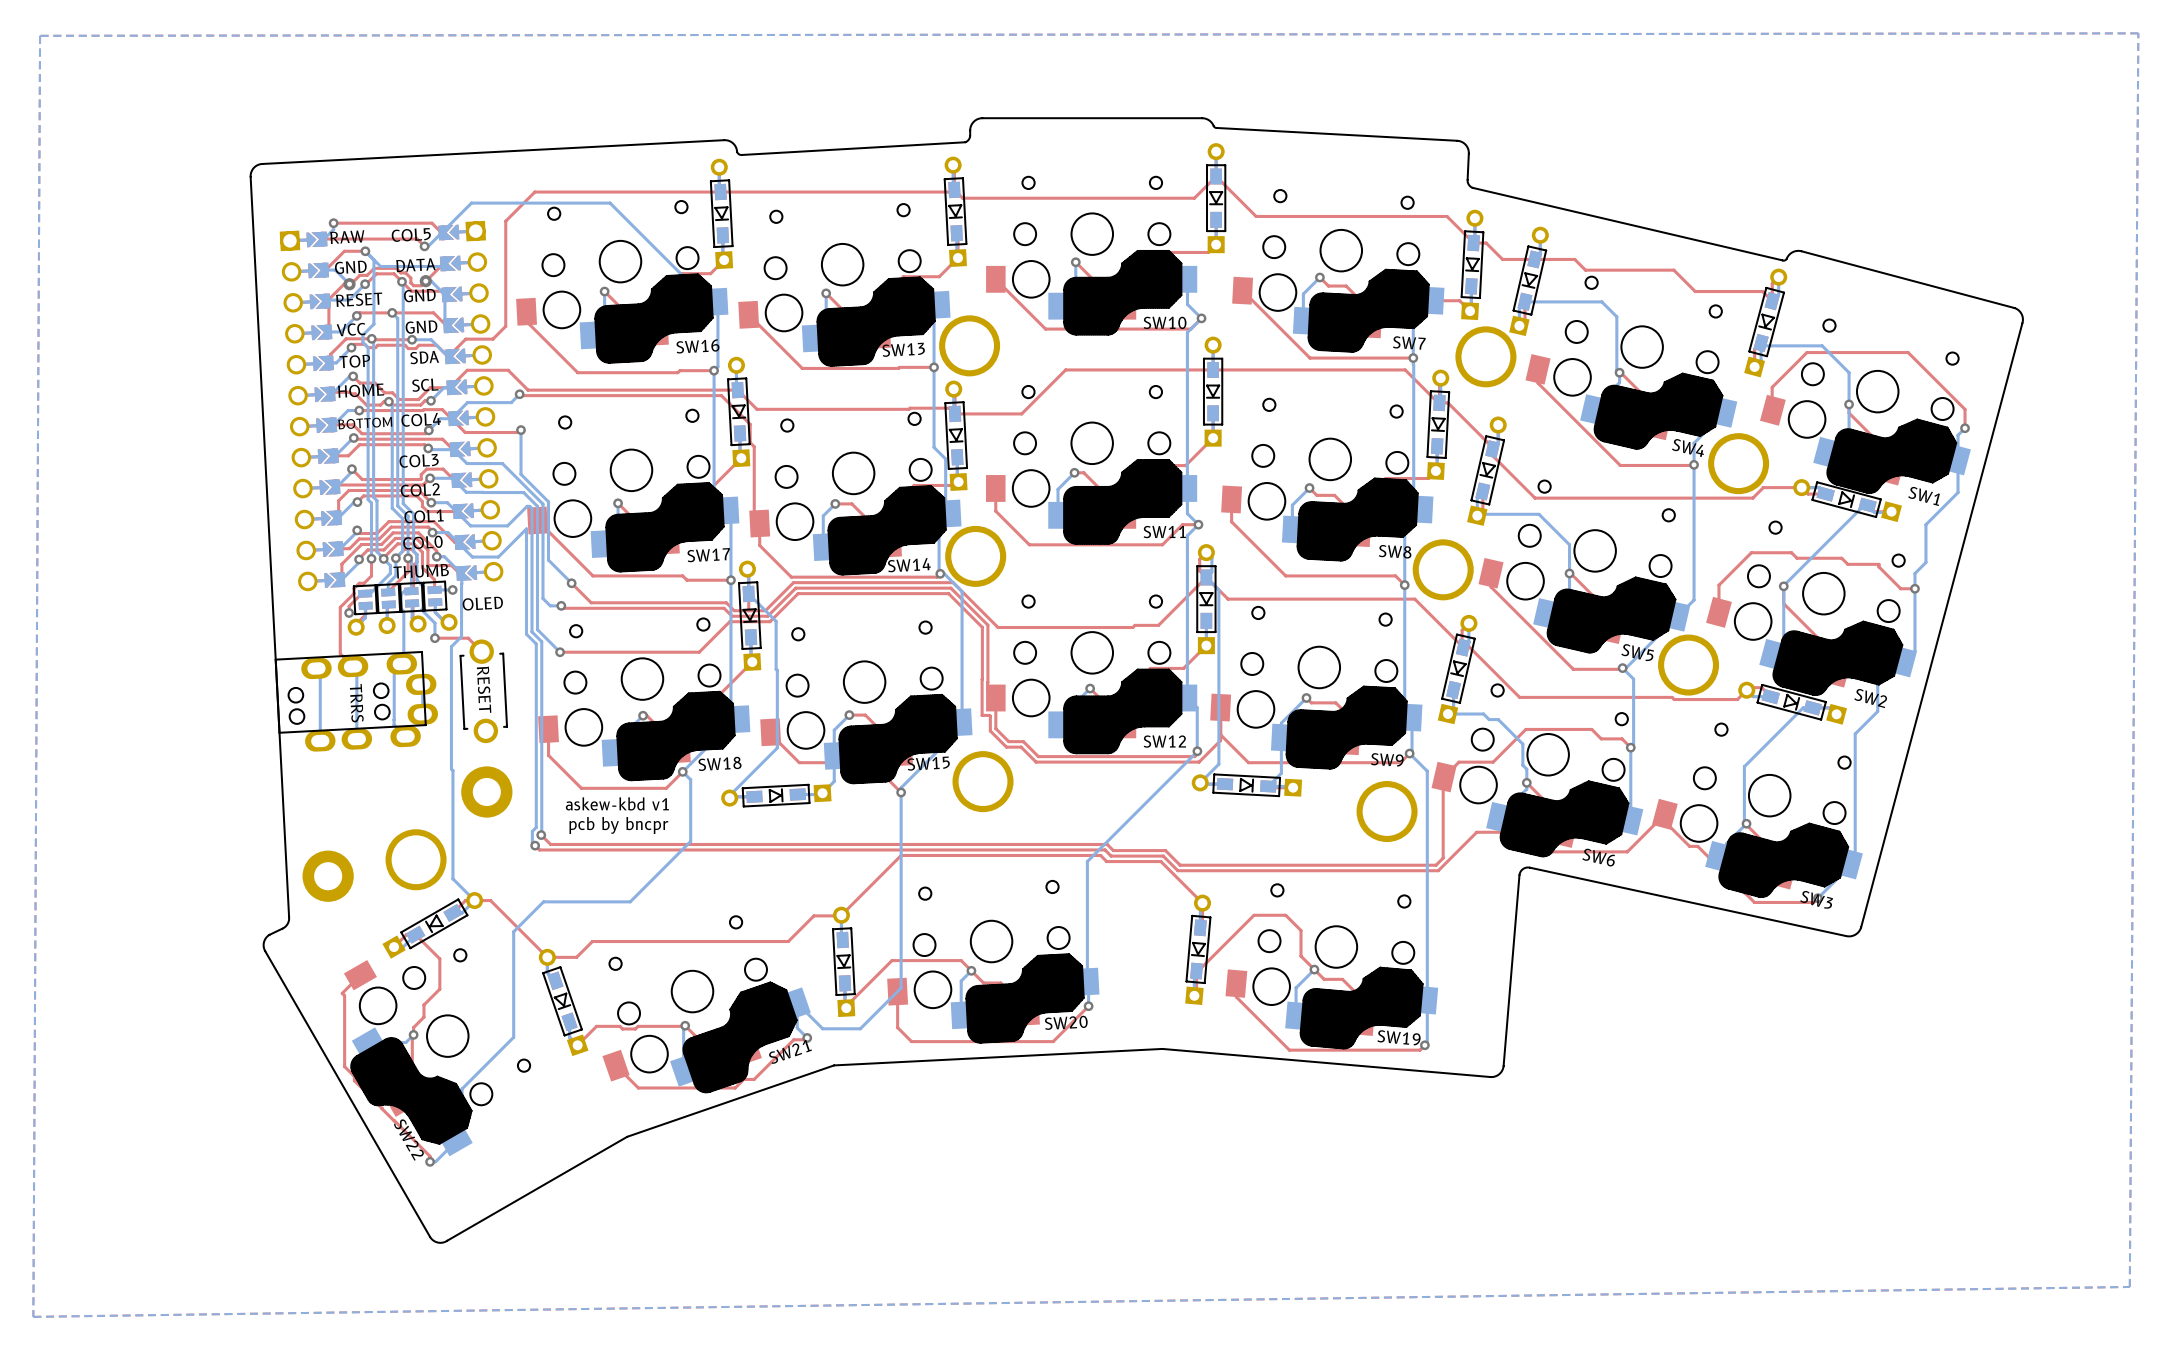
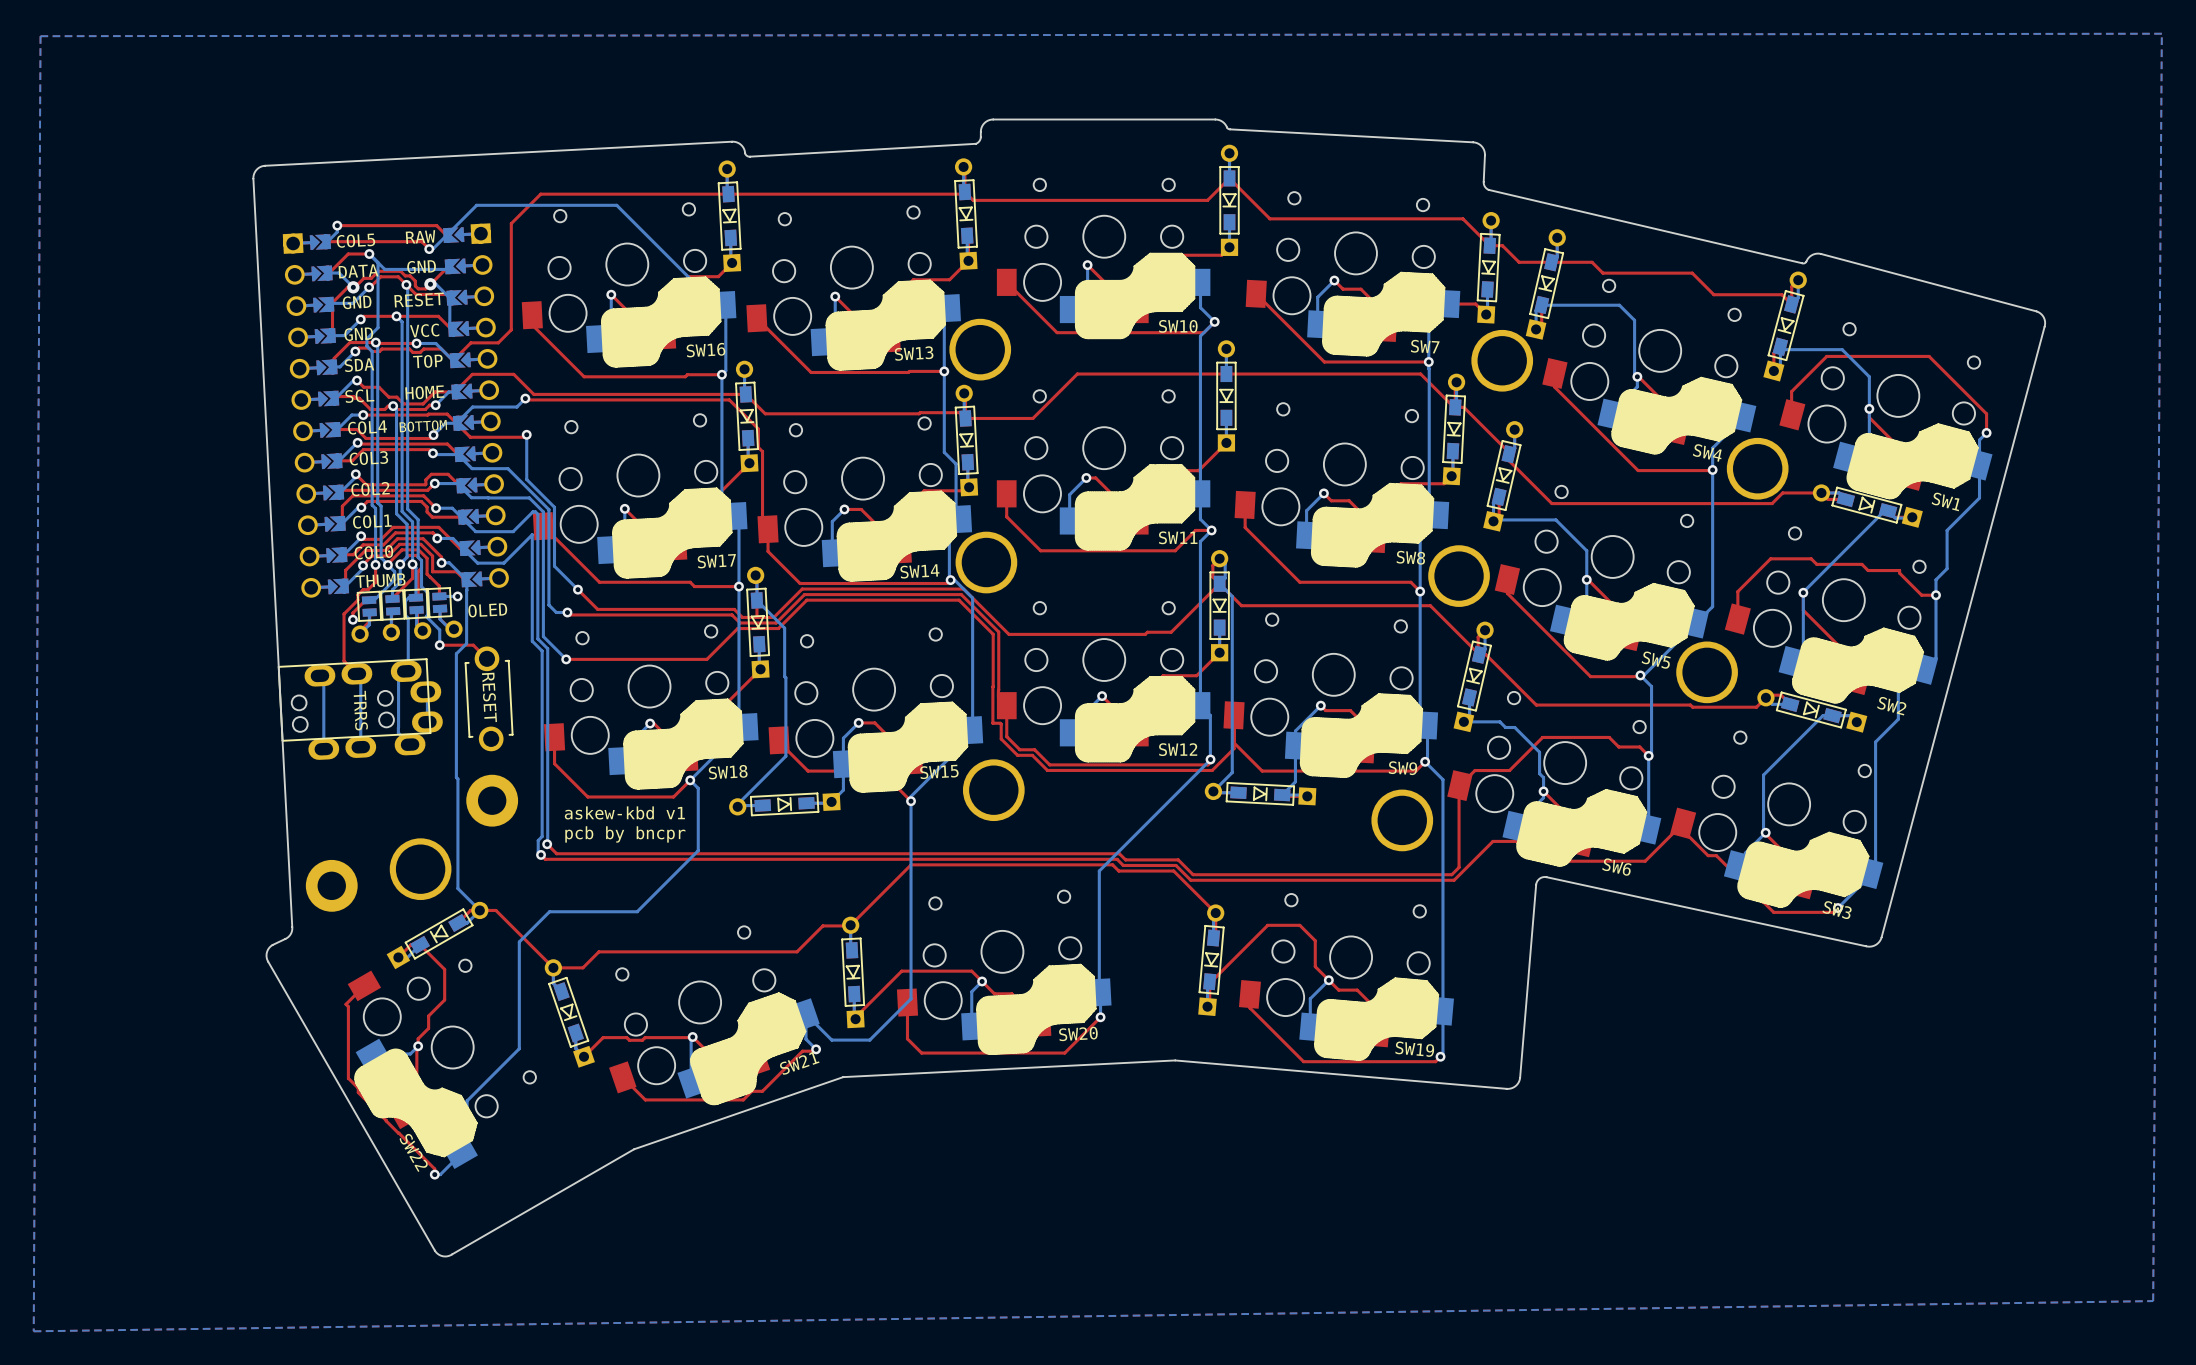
part footprint: [279, 220, 504, 592] -> [282, 223, 509, 598]

